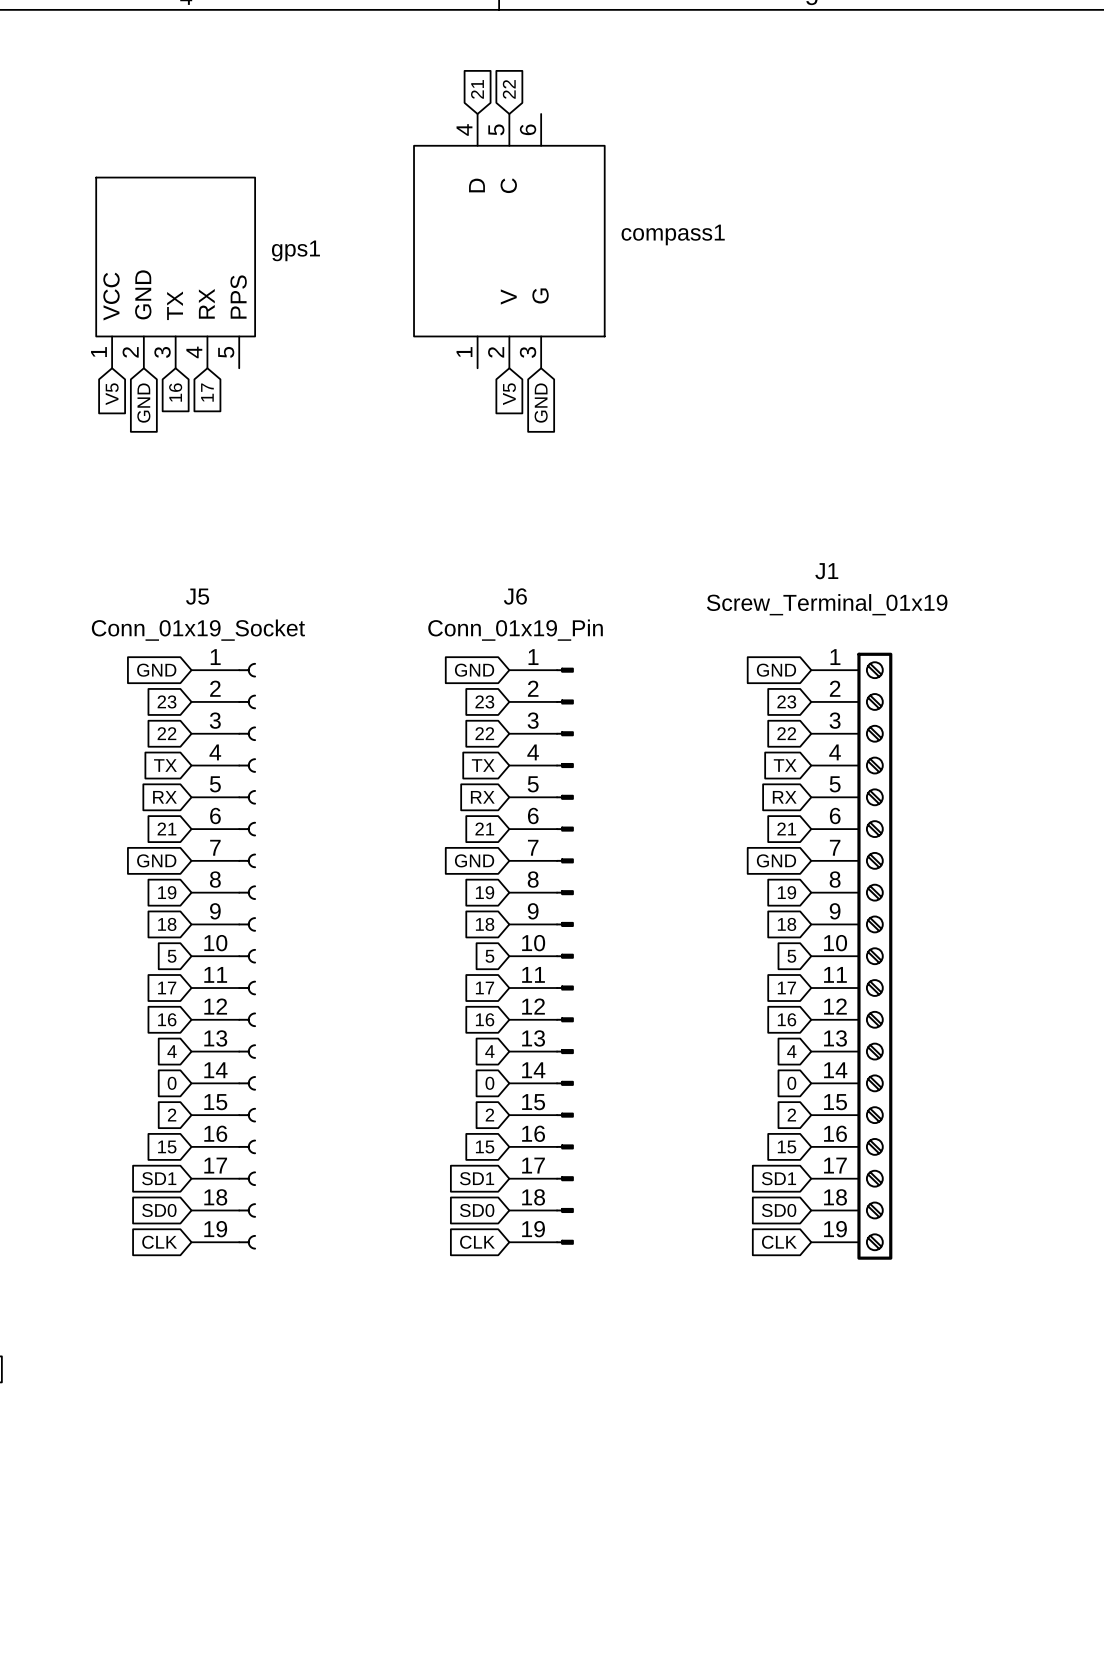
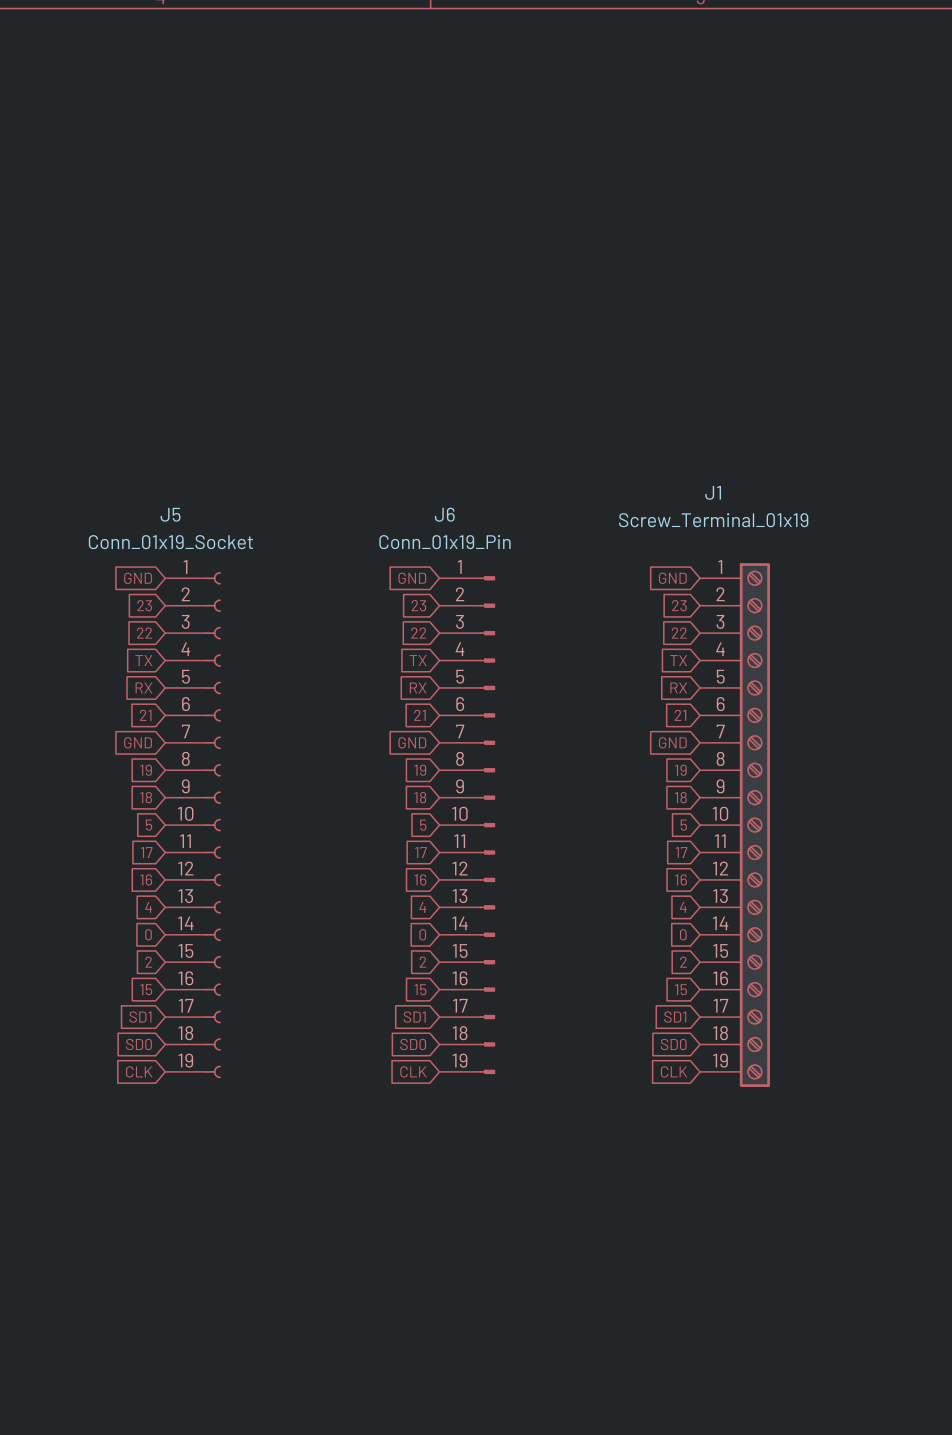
global label: 21 (477, 89) -> none
global label: 22 (509, 89) -> none
compass1: (509, 241) -> none
gps1: (175, 272) -> none
global label: 16 (175, 392) -> none
global label: 17 (207, 392) -> none
global label: V5 (112, 394) -> none
global label: V5 (509, 394) -> none
global label: GND (143, 403) -> none
global label: GND (541, 403) -> none

